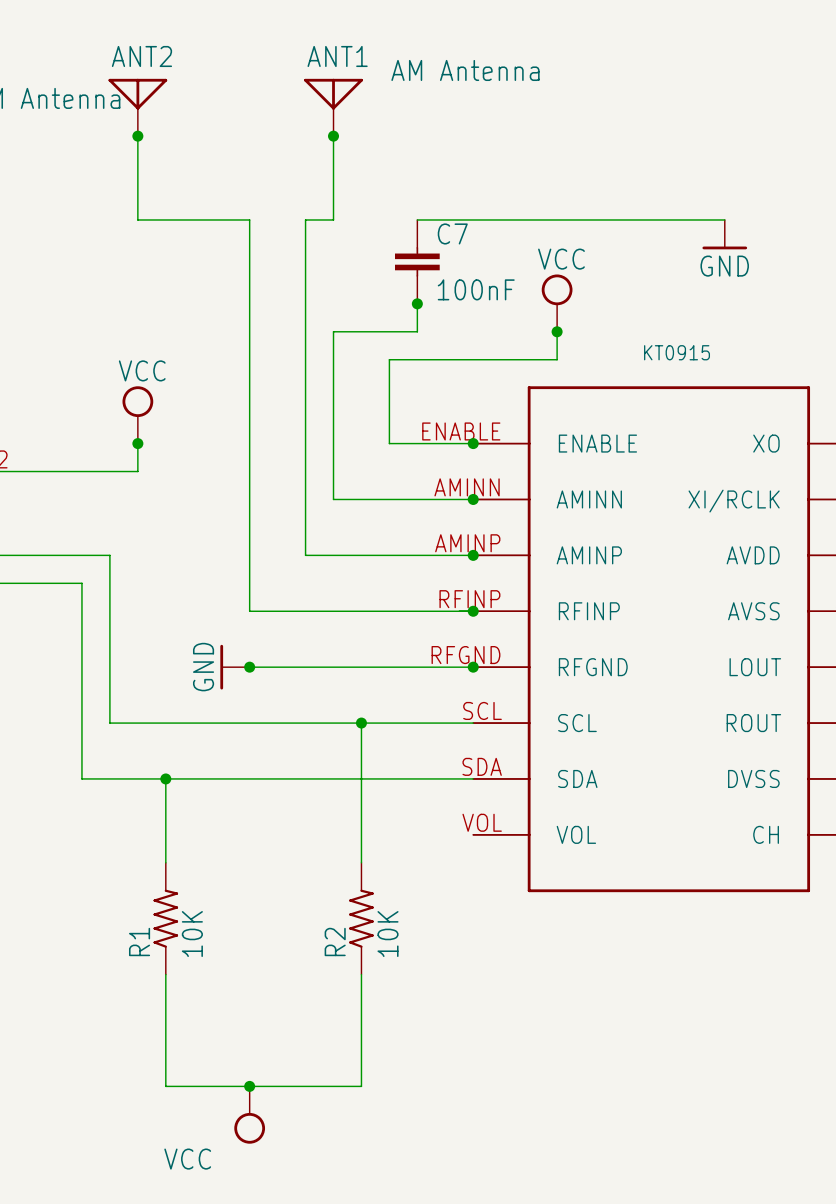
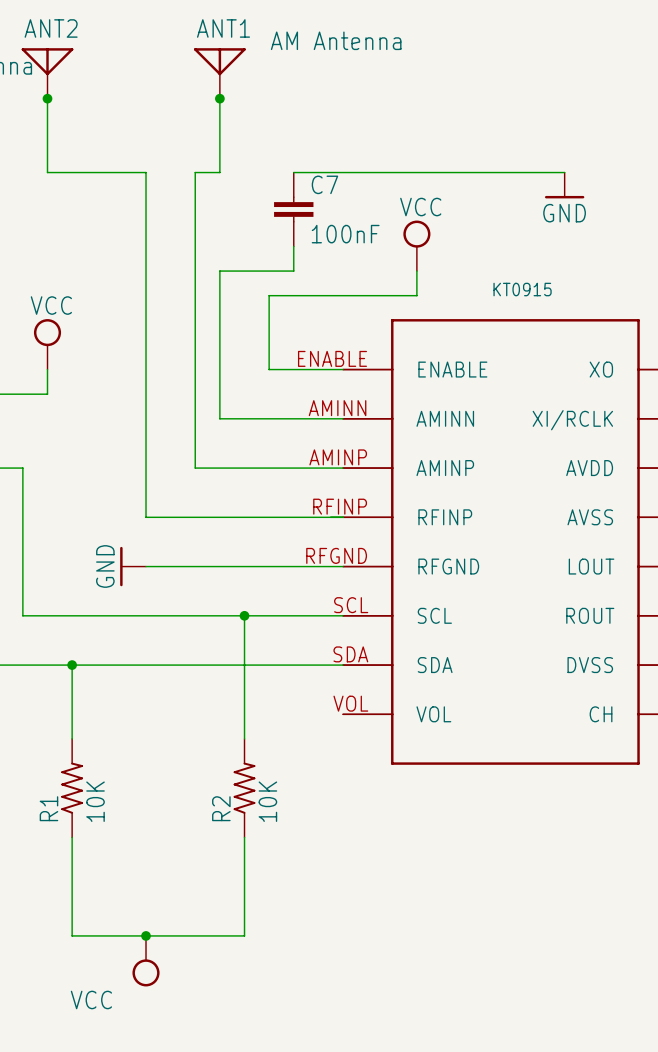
junction: (417, 303) -> none
junction: (557, 331) -> none
junction: (137, 443) -> none
junction: (473, 443) -> none
junction: (473, 499) -> none
junction: (473, 555) -> none
junction: (473, 611) -> none
junction: (249, 667) -> none
junction: (473, 667) -> none

